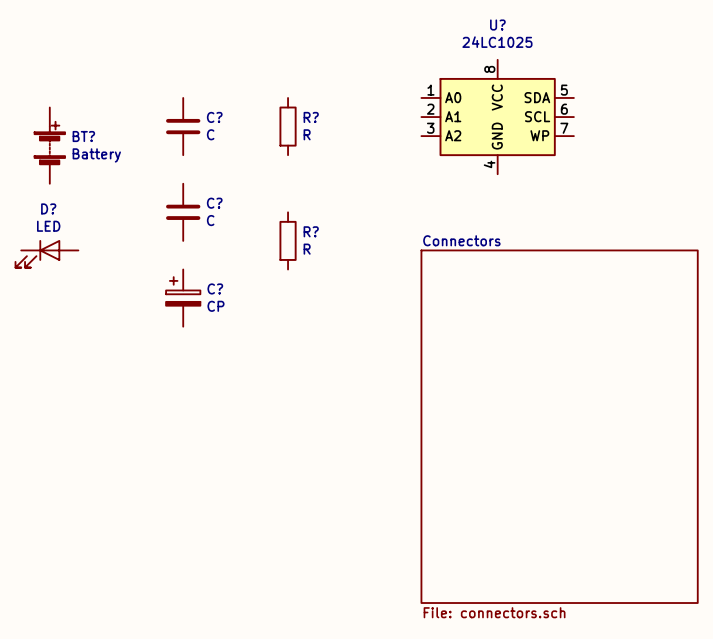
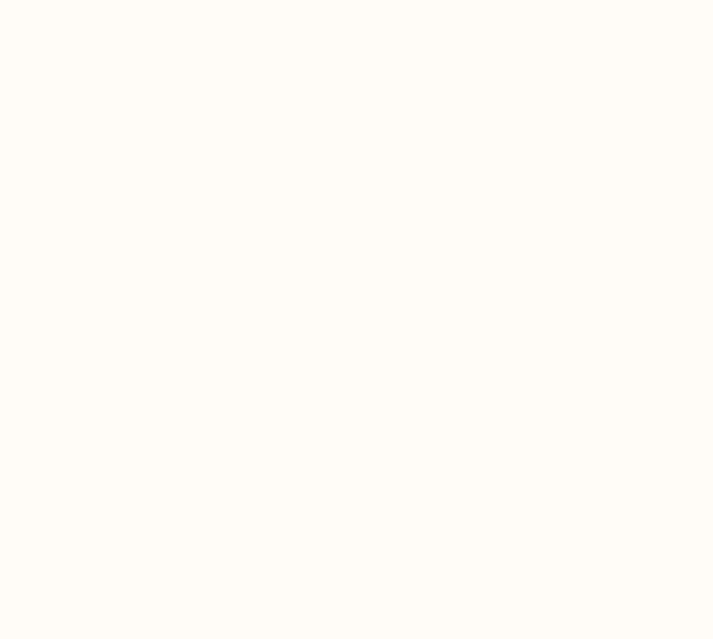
U?: 24LC1025 (497, 117) -> none
C?: C (183, 126) -> none
R?: R (288, 126) -> none
BT?: Battery (49, 145) -> none
C?: C (183, 212) -> none
R?: R (288, 240) -> none
D?: LED (46, 253) -> none
C?: CP (183, 298) -> none
sheet Connectors: File: connectors.sch (559, 426) -> none

